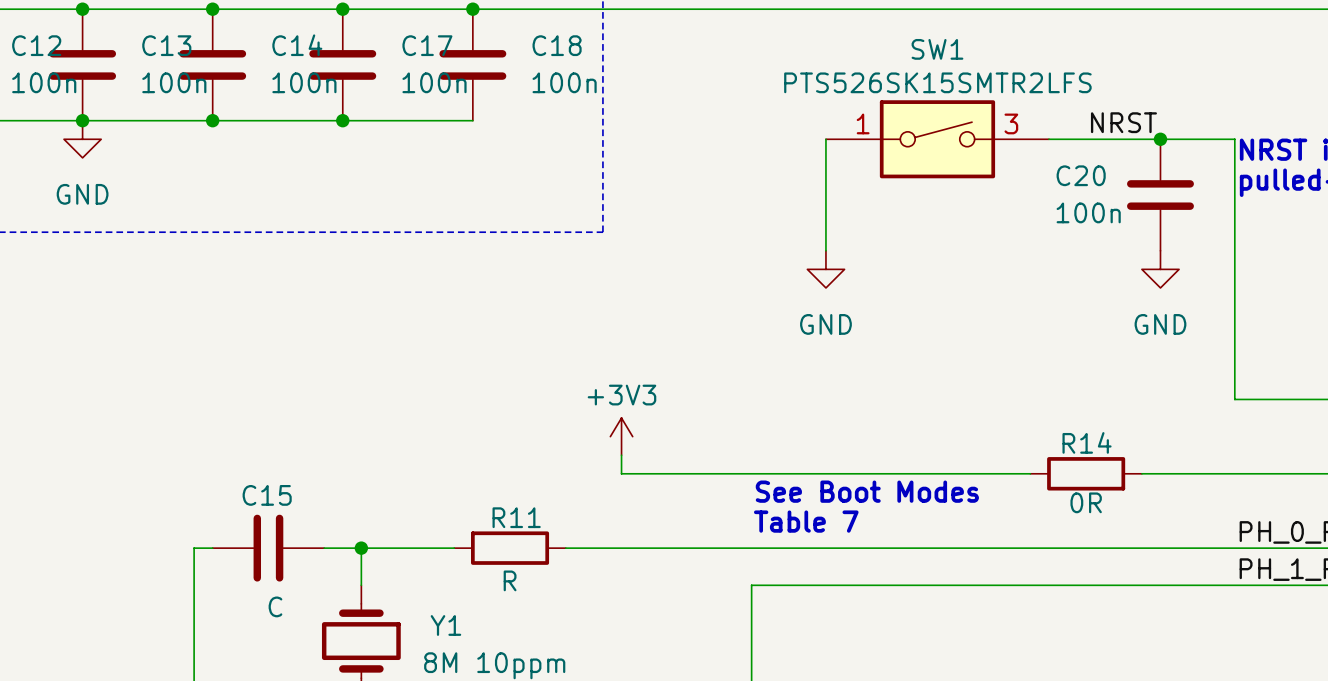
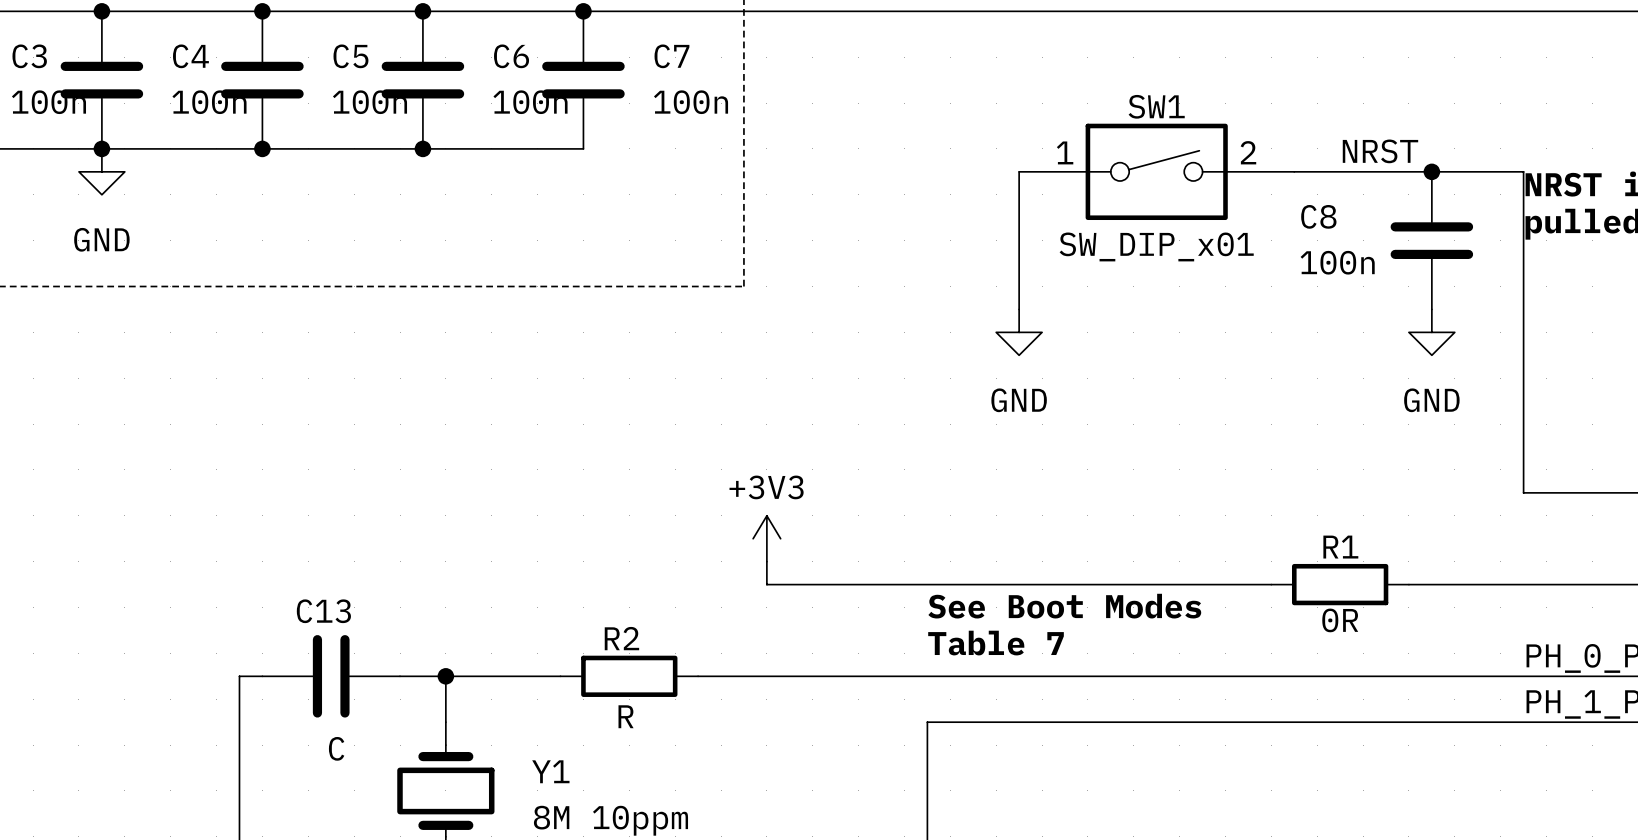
C12 name: C12 (36, 45) -> C3 (29, 56)
C13 name: C13 (166, 45) -> C4 (190, 56)
C14 name: C14 (297, 45) -> C5 (350, 56)
C17 name: C17 (427, 45) -> C6 (511, 56)
C18 name: C18 (557, 45) -> C7 (671, 56)
SW1 name position: SW1 (937, 49) -> SW1 (1156, 106)
SW1 value: PTS526SK15SMTR2LFS (937, 82) -> SW_DIP_x01 (1156, 246)
SW1 pin number: 3 (1011, 123) -> 2 (1248, 152)
C20 name: C20 (1081, 175) -> C8 (1318, 216)
R14 name: R14 (1087, 442) -> R1 (1340, 547)
C15 name: C15 (267, 495) -> C13 (323, 611)
R11 name: R11 (516, 517) -> R2 (621, 638)

